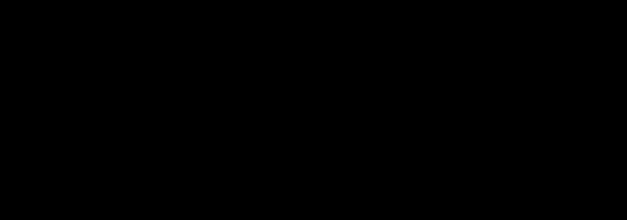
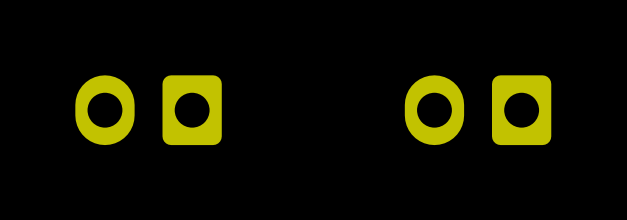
part: none -> (148, 110)
part: none -> (478, 110)

